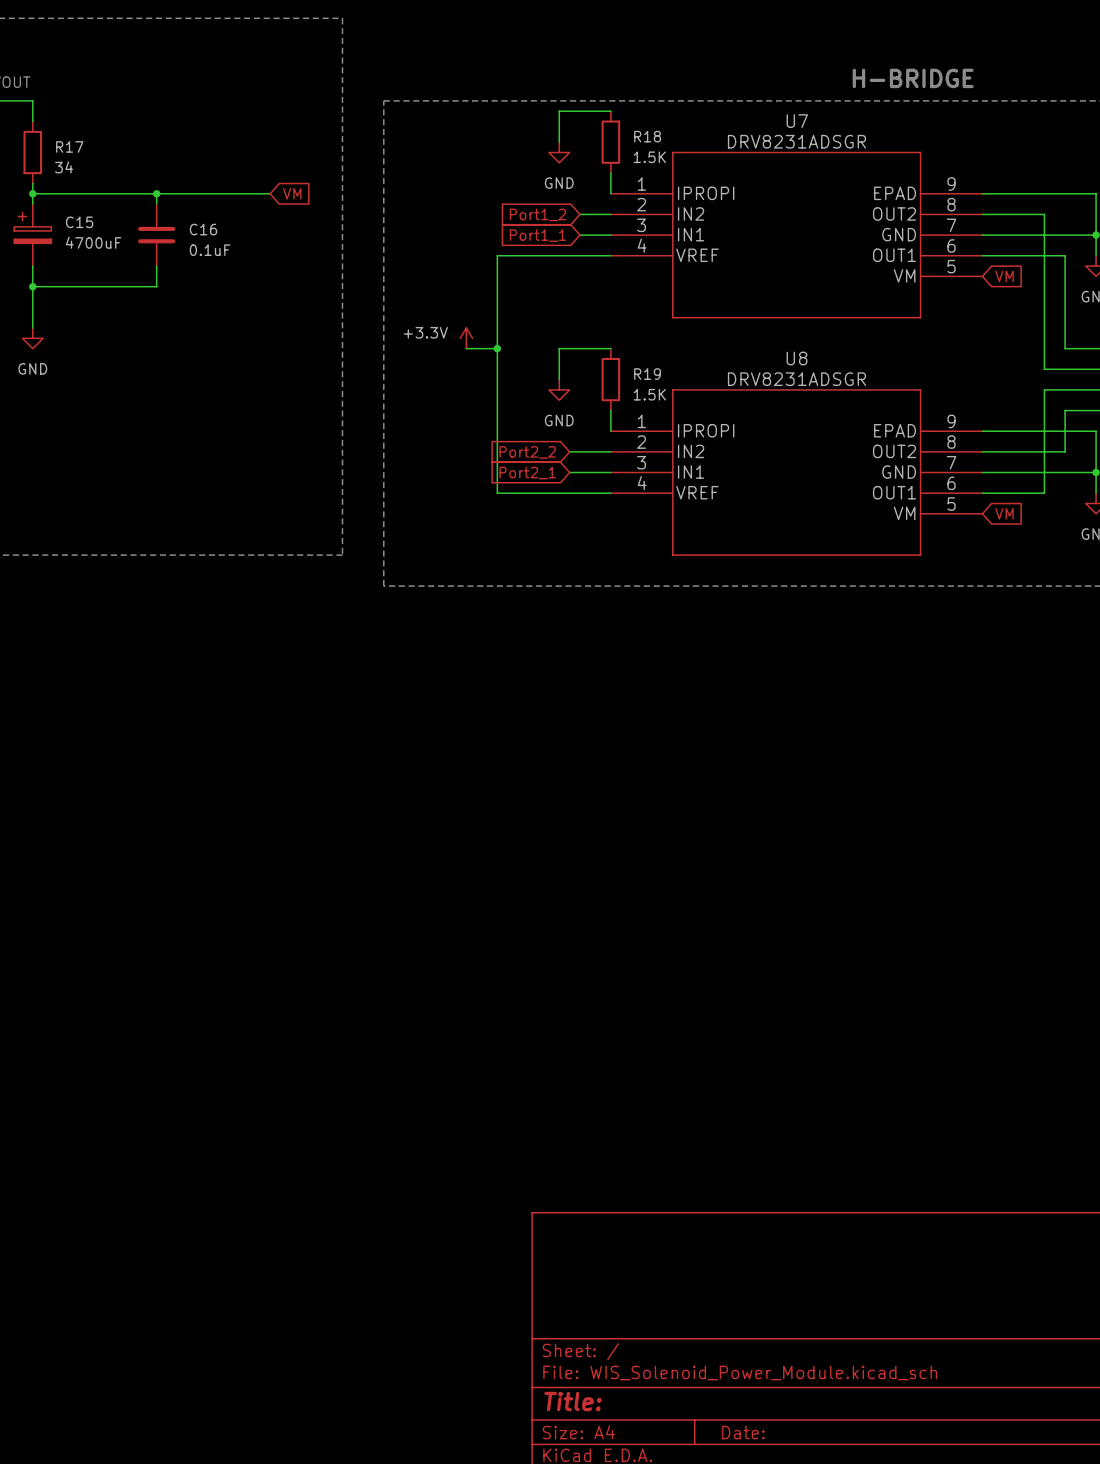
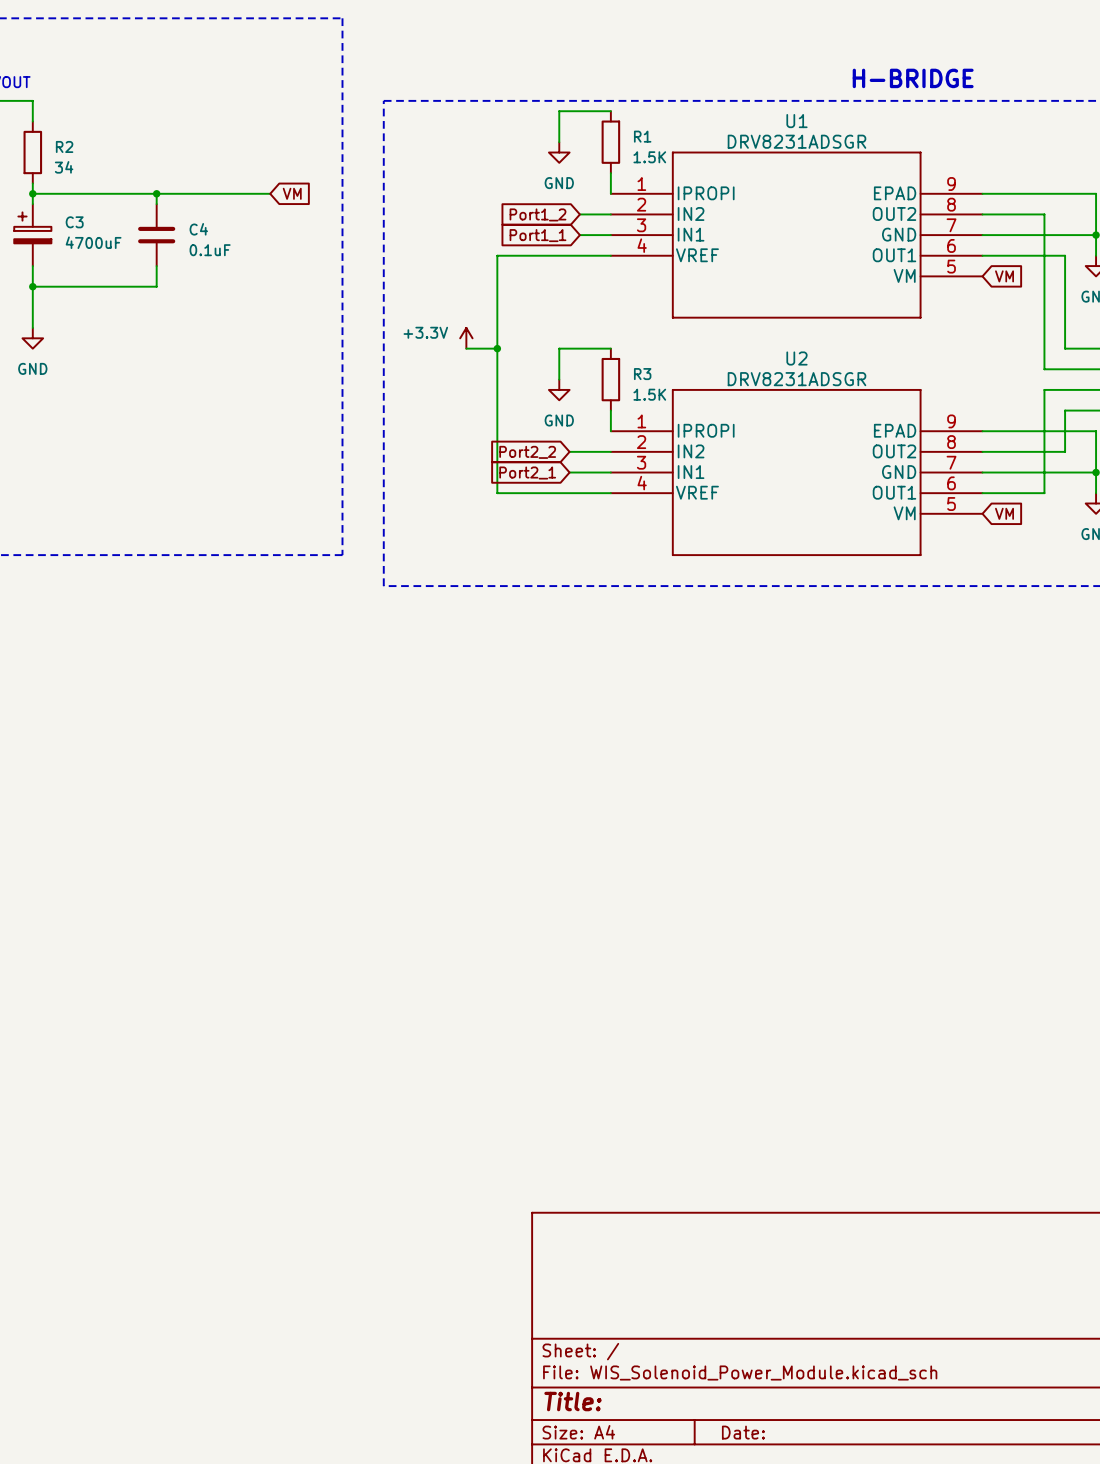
U7 name: U7 (797, 121) -> U1 (796, 121)
R18 name: R18 (647, 136) -> R1 (642, 136)
R17 name: R17 (69, 146) -> R2 (64, 146)
C15 name: C15 (79, 222) -> C3 (74, 222)
C16 name: C16 (203, 229) -> C4 (198, 229)
U8 name: U8 (796, 358) -> U2 (796, 358)
R19 name: R19 (647, 374) -> R3 (642, 374)

